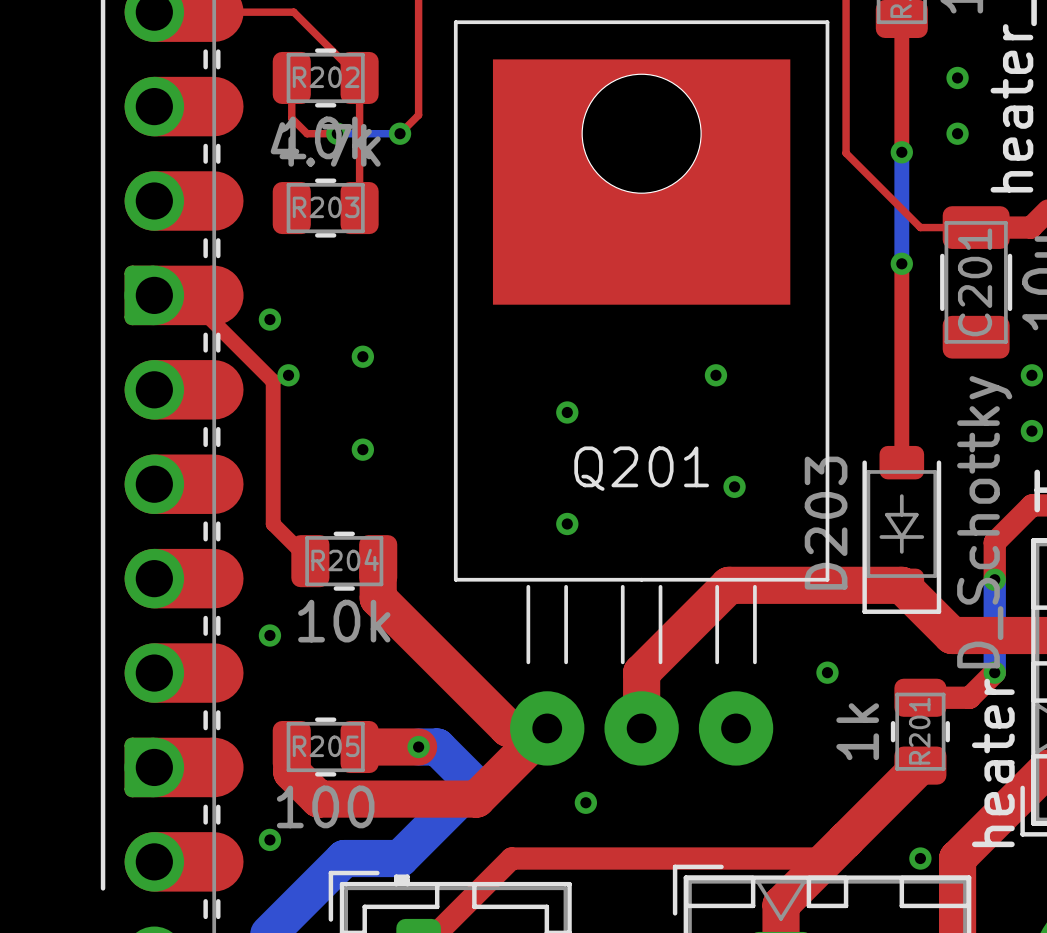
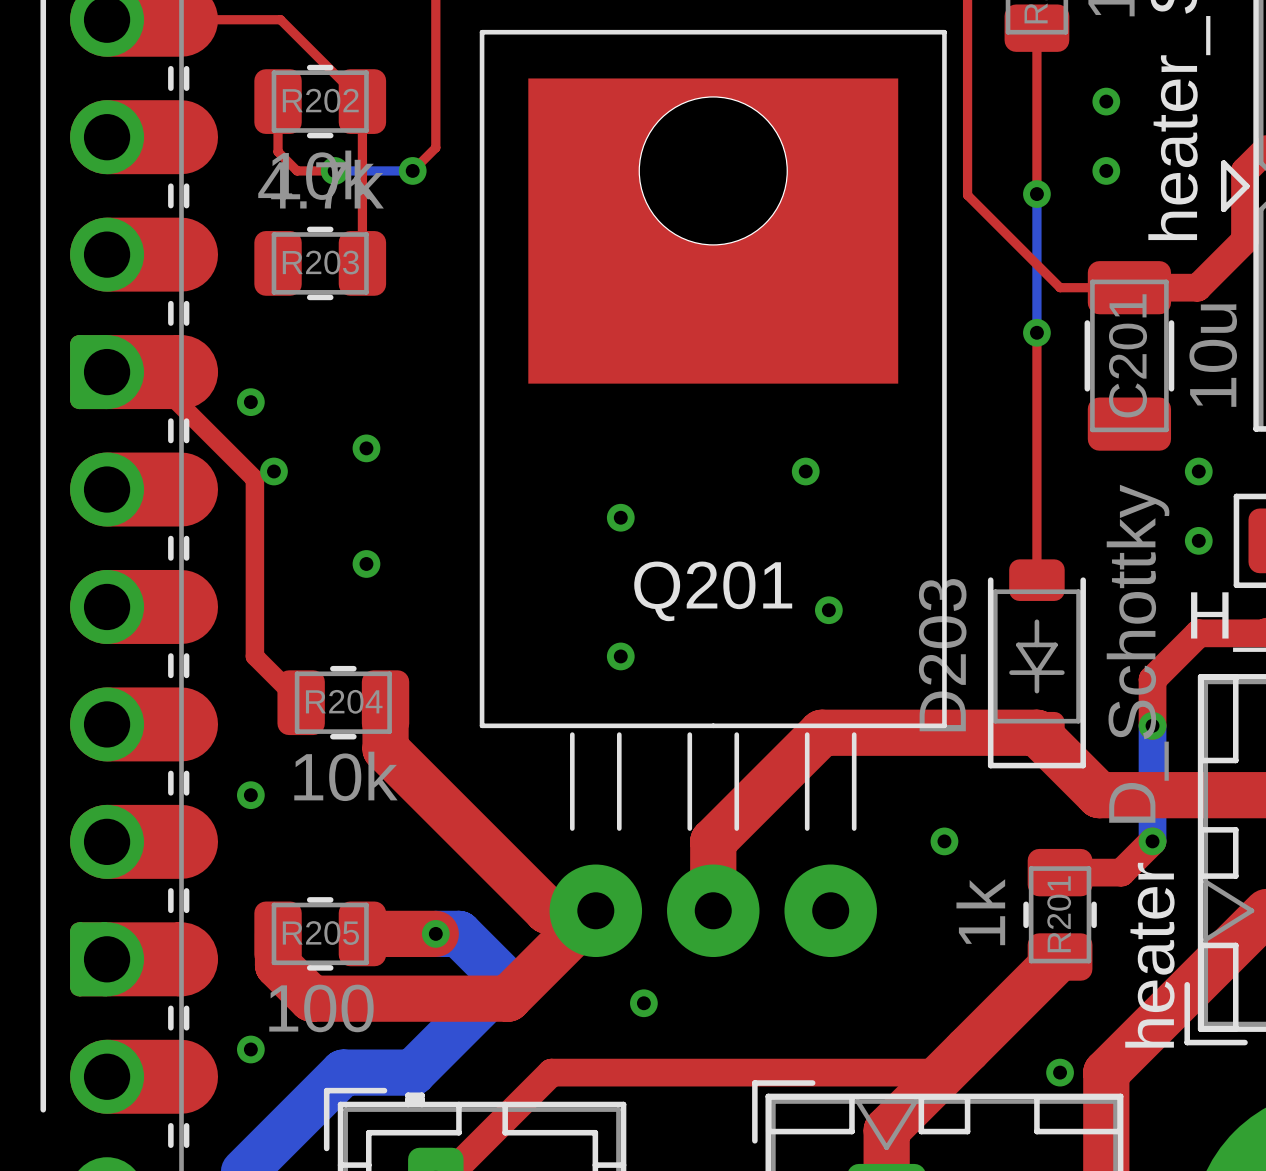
top track width: thick (901, 18) (901, 152) -> thin (1036, 28) (1036, 194)
bottom track width: thick (901, 152) (901, 263) -> thin (1036, 194) (1036, 332)
top track width: thick (901, 263) (901, 462) -> thin (1036, 332) (1036, 580)

